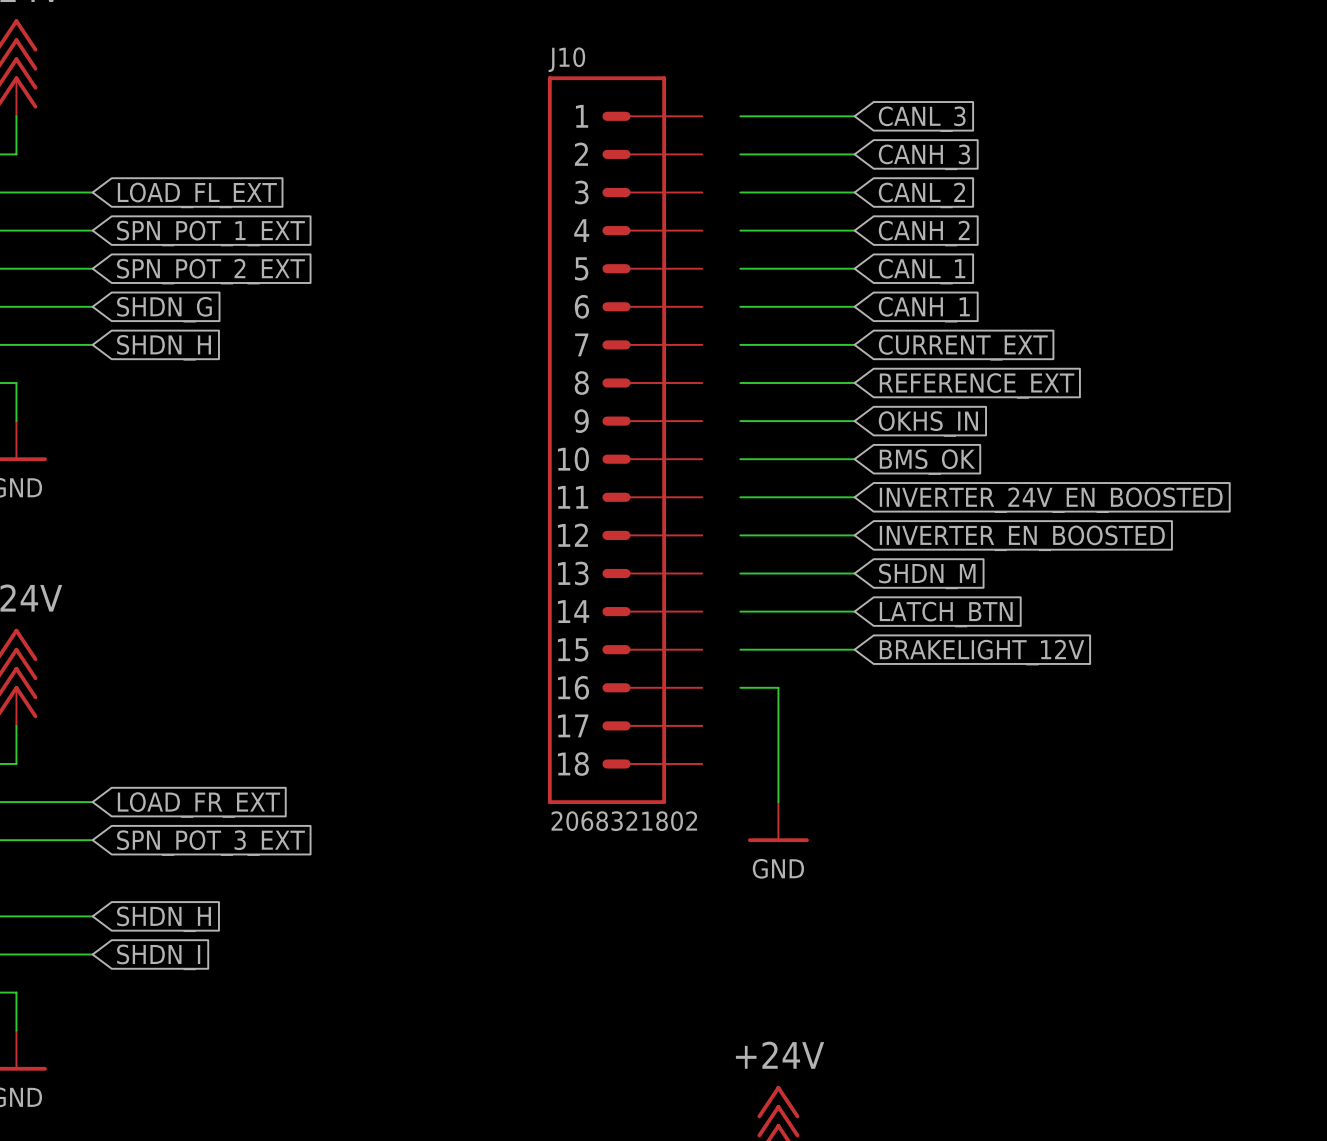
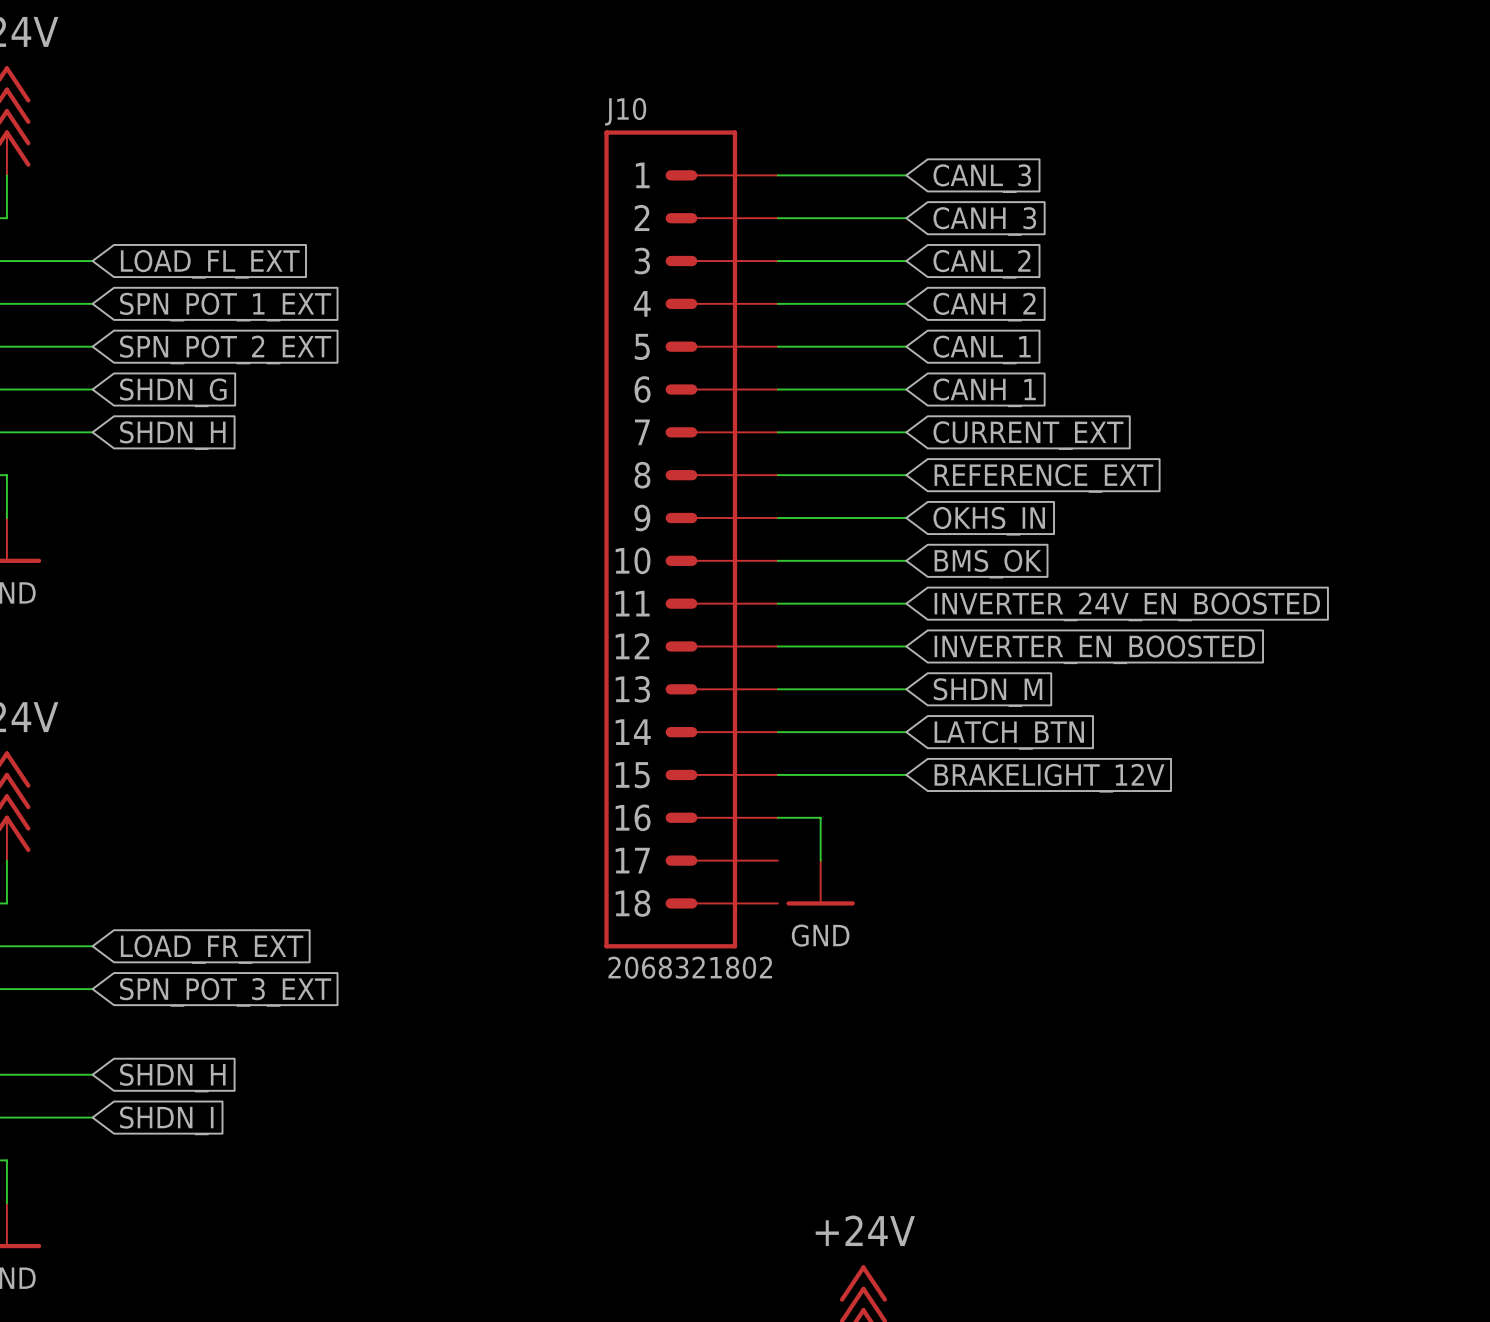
wire: (816, 116) (854, 116) -> (777, 175) (820, 175)
global label position: CANL_3 (922, 119) -> CANL_3 (982, 178)
wire: (816, 154) (854, 154) -> (777, 218) (820, 218)
global label position: CANH_3 (924, 157) -> CANH_3 (984, 221)
wire: (816, 192) (854, 192) -> (777, 261) (820, 261)
global label position: CANL_2 (921, 195) -> CANL_2 (981, 264)
wire: (816, 230) (854, 230) -> (777, 303) (820, 303)
global label position: CANH_2 (924, 233) -> CANH_2 (984, 307)
wire: (816, 268) (854, 268) -> (777, 346) (820, 346)
global label position: CANL_1 (922, 271) -> CANL_1 (982, 349)
wire: (816, 306) (854, 306) -> (777, 389) (820, 389)
global label position: CANH_1 (924, 309) -> CANH_1 (984, 392)
wire: (816, 344) (854, 344) -> (777, 432) (820, 432)
global label position: CURRENT_EXT (963, 347) -> CURRENT_EXT (1028, 435)
wire: (816, 383) (854, 383) -> (777, 475) (820, 475)
global label position: REFERENCE_EXT (977, 385) -> REFERENCE_EXT (1043, 478)
wire: (816, 421) (854, 421) -> (777, 517) (820, 517)
global label position: OKHS_IN (928, 424) -> OKHS_IN (989, 521)
wire: (816, 459) (854, 459) -> (777, 560) (820, 560)
global label position: BMS_OK (927, 462) -> BMS_OK (988, 564)
wire: (816, 497) (854, 497) -> (777, 603) (820, 603)
global label position: INVERTER_24V_EN_BOOSTED (1051, 500) -> INVERTER_24V_EN_BOOSTED (1127, 606)
wire: (816, 535) (854, 535) -> (777, 646) (820, 646)
global label position: INVERTER_EN_BOOSTED (1022, 538) -> INVERTER_EN_BOOSTED (1094, 649)
wire: (816, 573) (854, 573) -> (777, 689) (820, 689)
global label position: SHDN_M (927, 576) -> SHDN_M (987, 692)
wire: (816, 611) (854, 611) -> (777, 732) (820, 732)
global label position: LATCH_BTN (946, 614) -> LATCH_BTN (1009, 735)
wire: (816, 649) (854, 649) -> (777, 774) (820, 774)
global label position: BRAKELIGHT_12V (982, 652) -> BRAKELIGHT_12V (1049, 778)
wire: none -> (777, 817) (820, 817) (820, 860)
wire: (740, 687) (778, 687) (778, 802) -> none
power symbol position: GND (778, 822) -> GND (820, 883)

